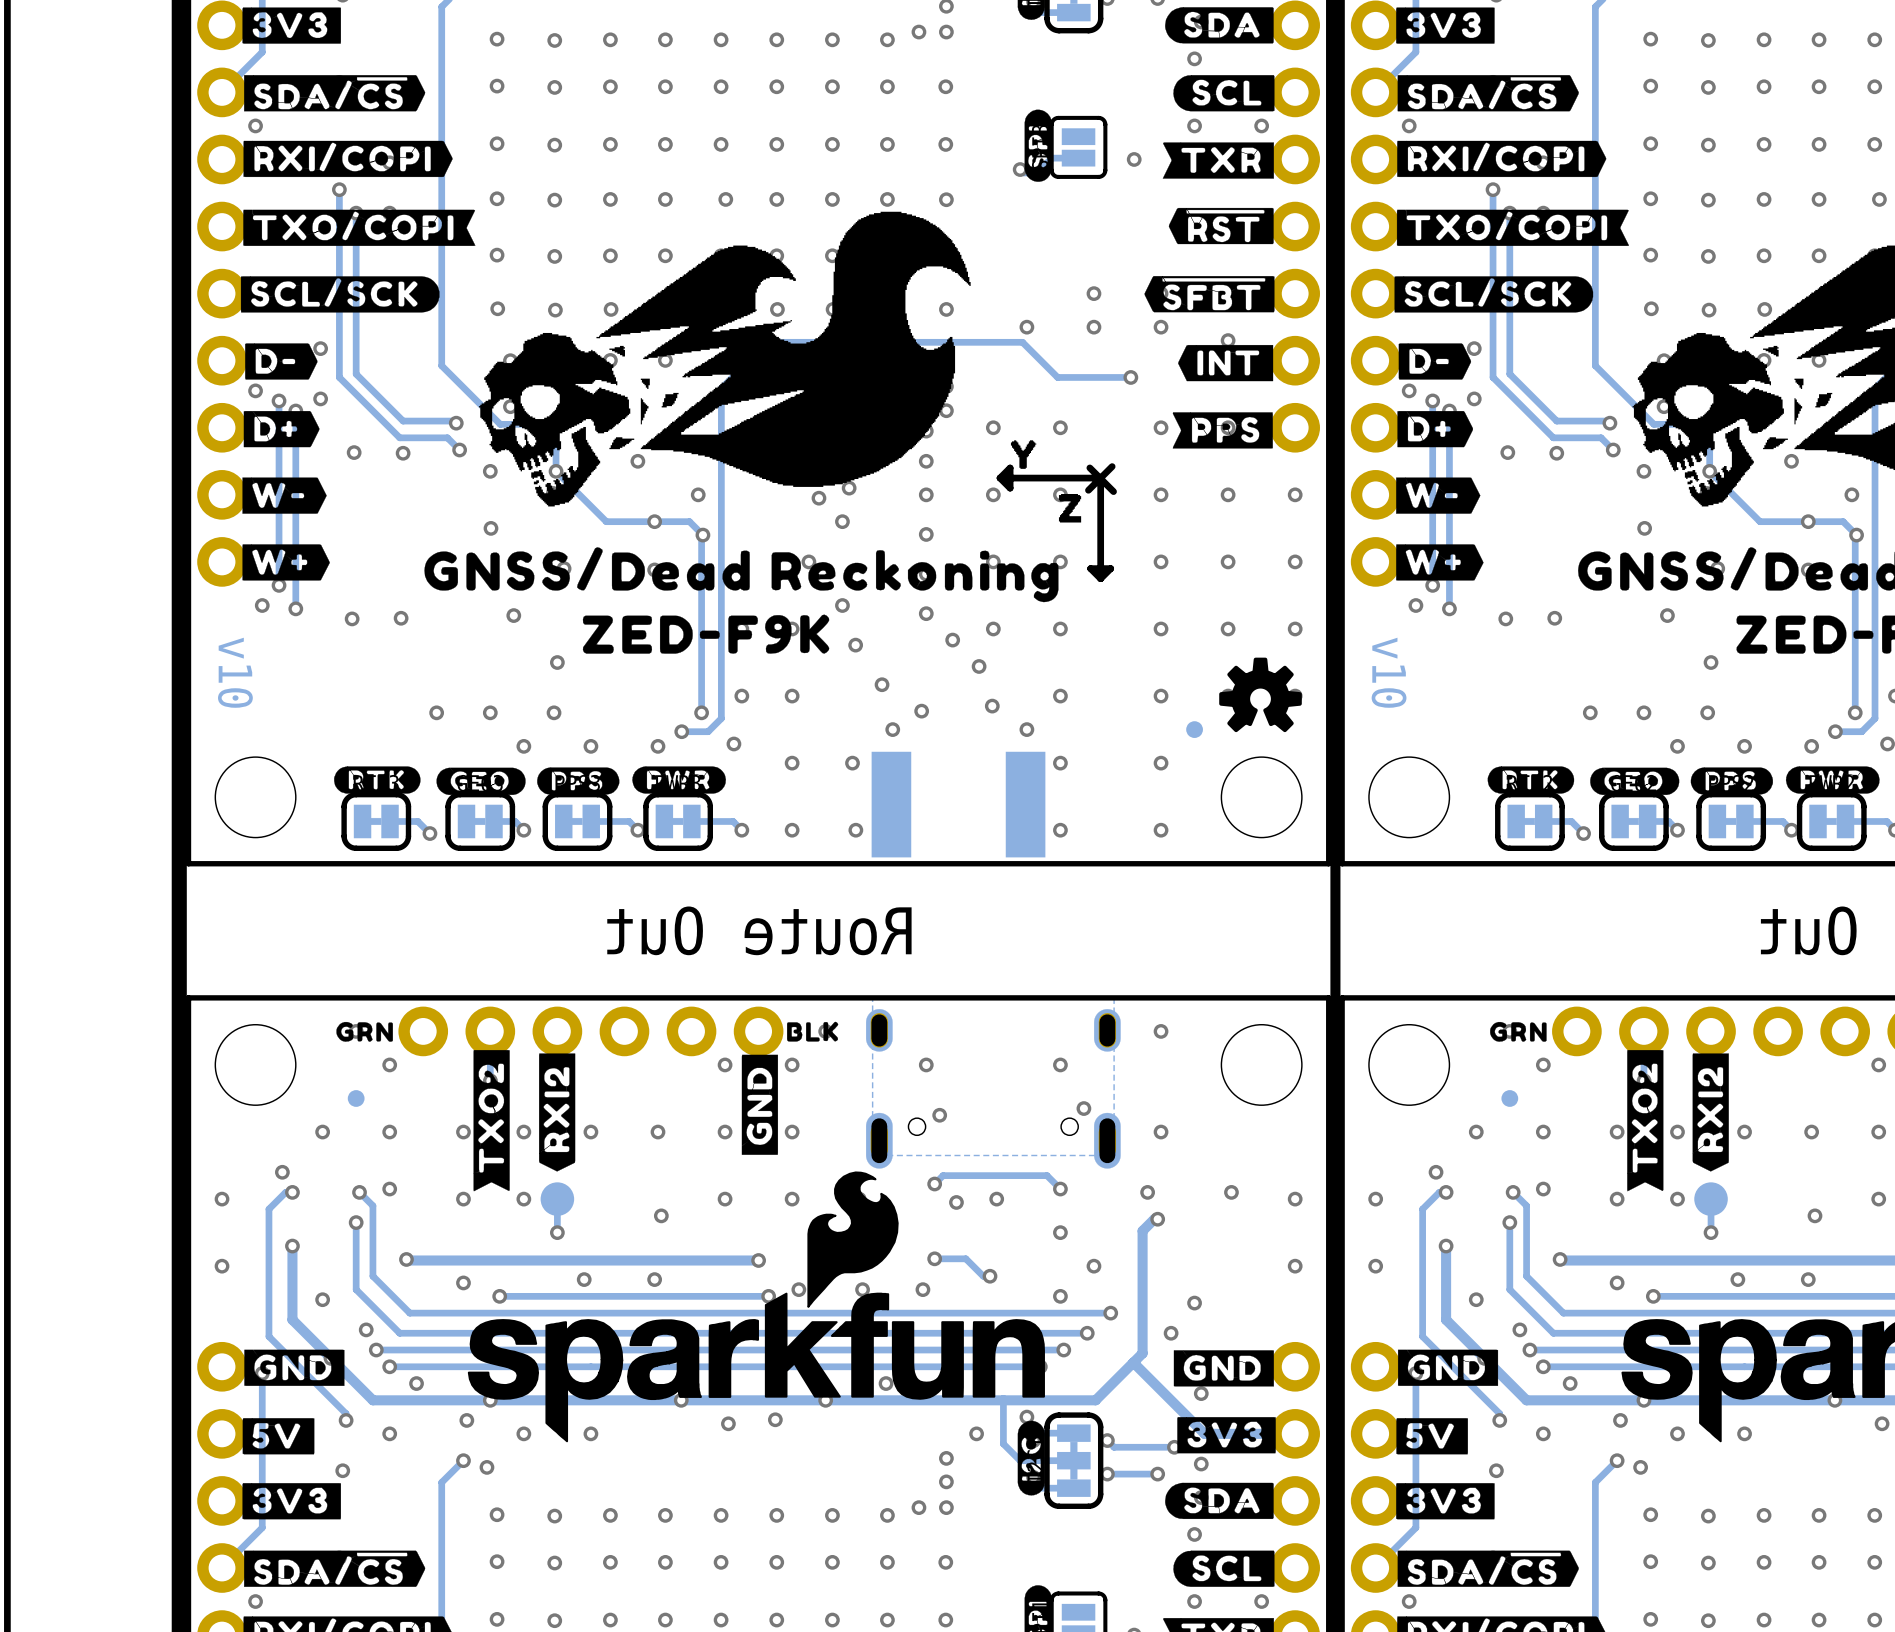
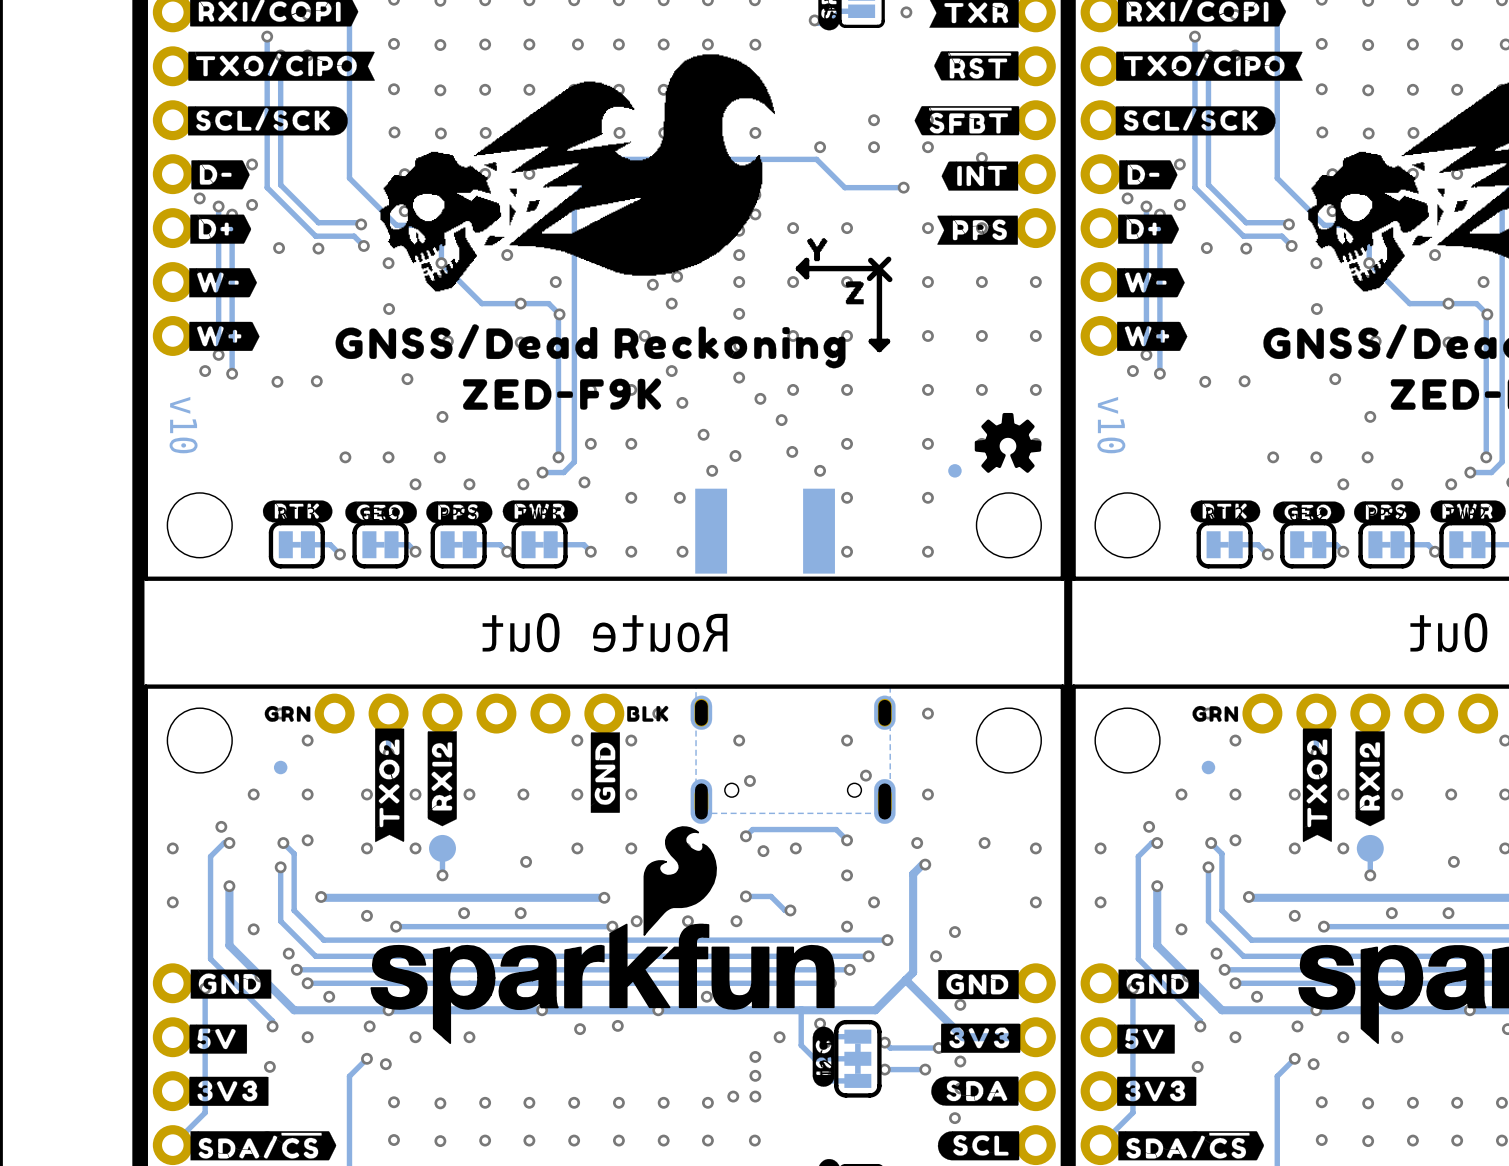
drawing shape: [243, 209, 476, 246] -> [188, 51, 375, 81]
drawing shape: [1396, 209, 1630, 246] -> [1116, 51, 1303, 81]

